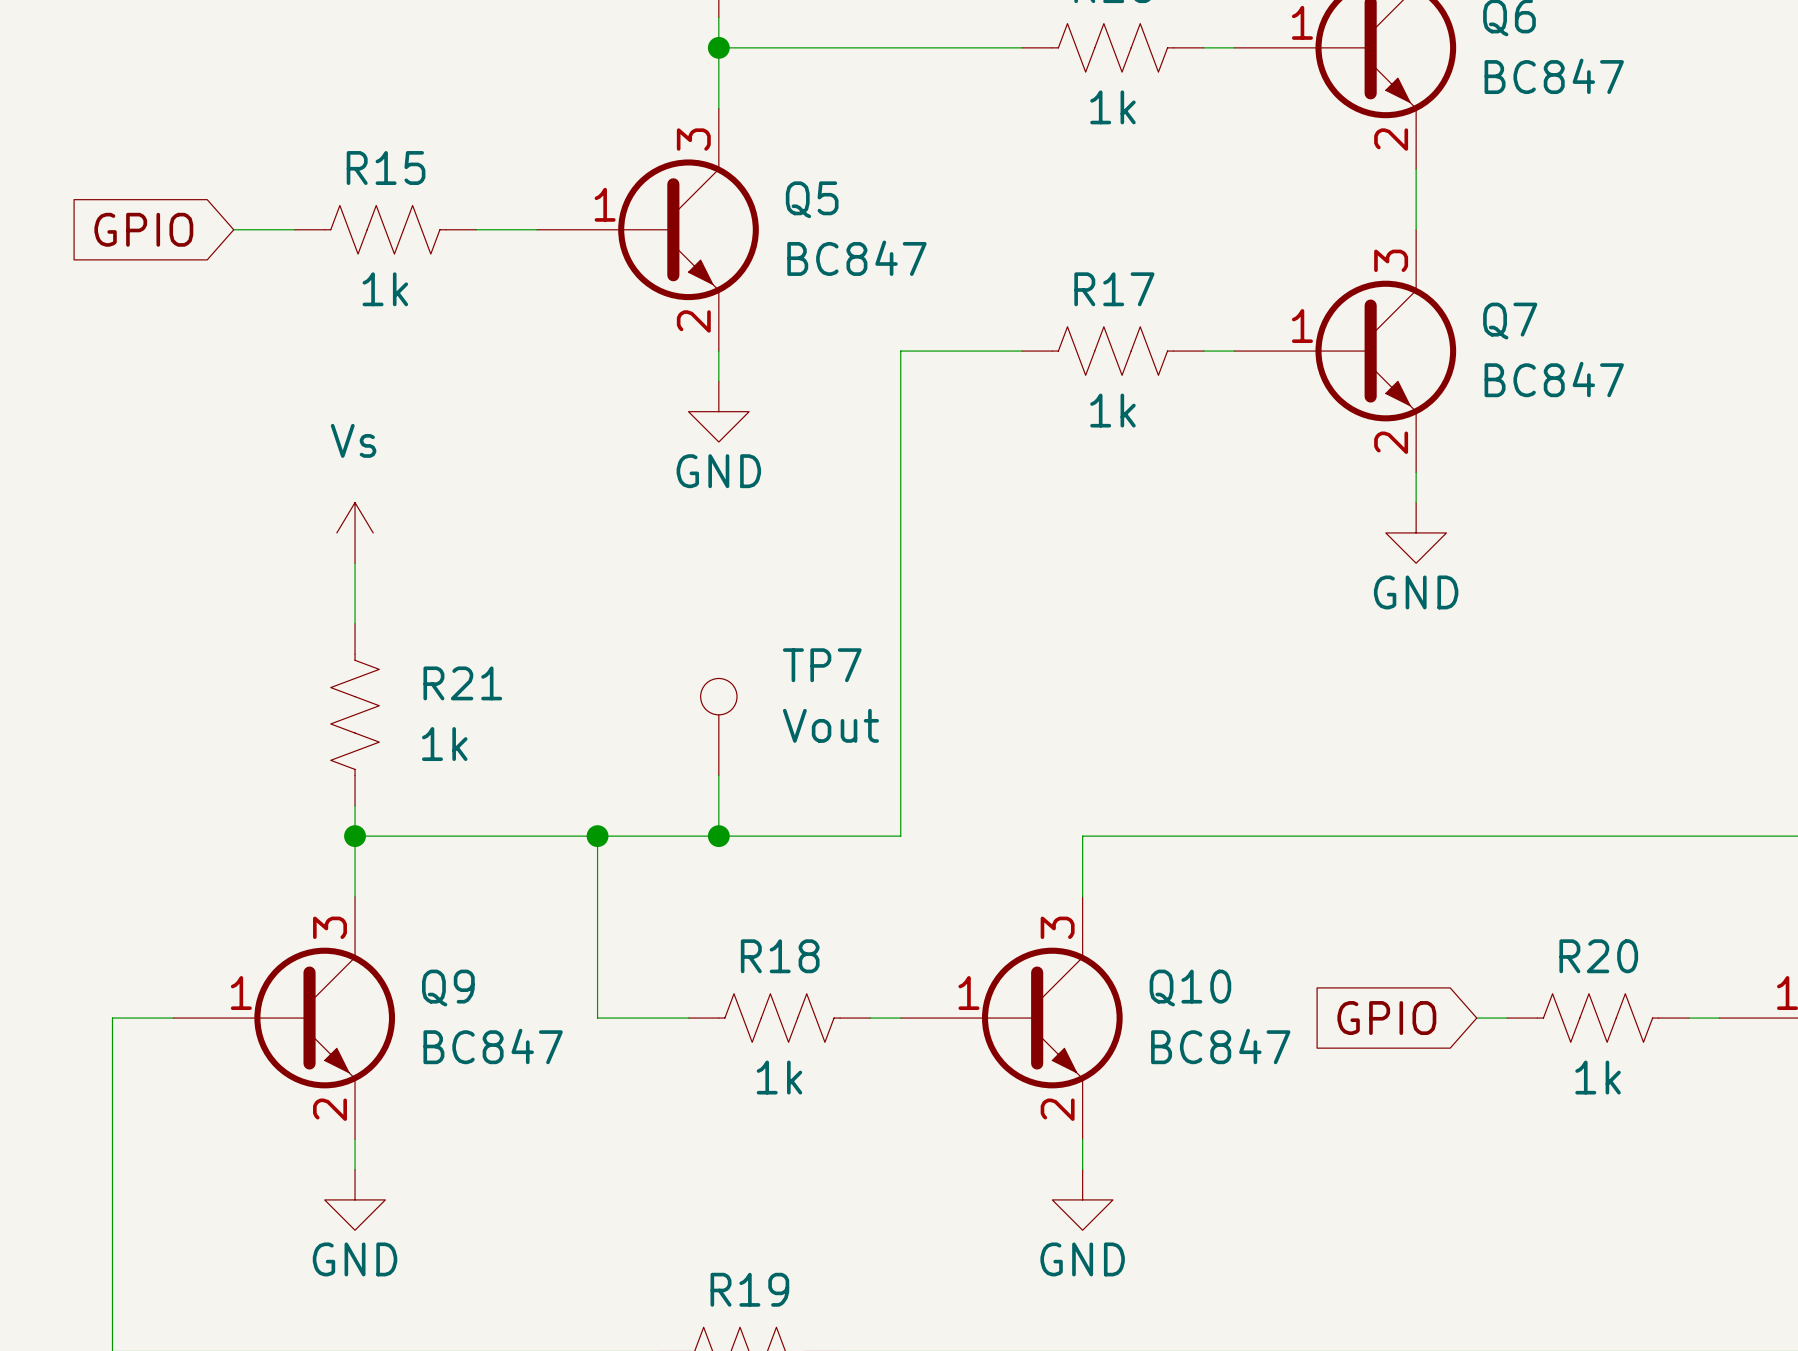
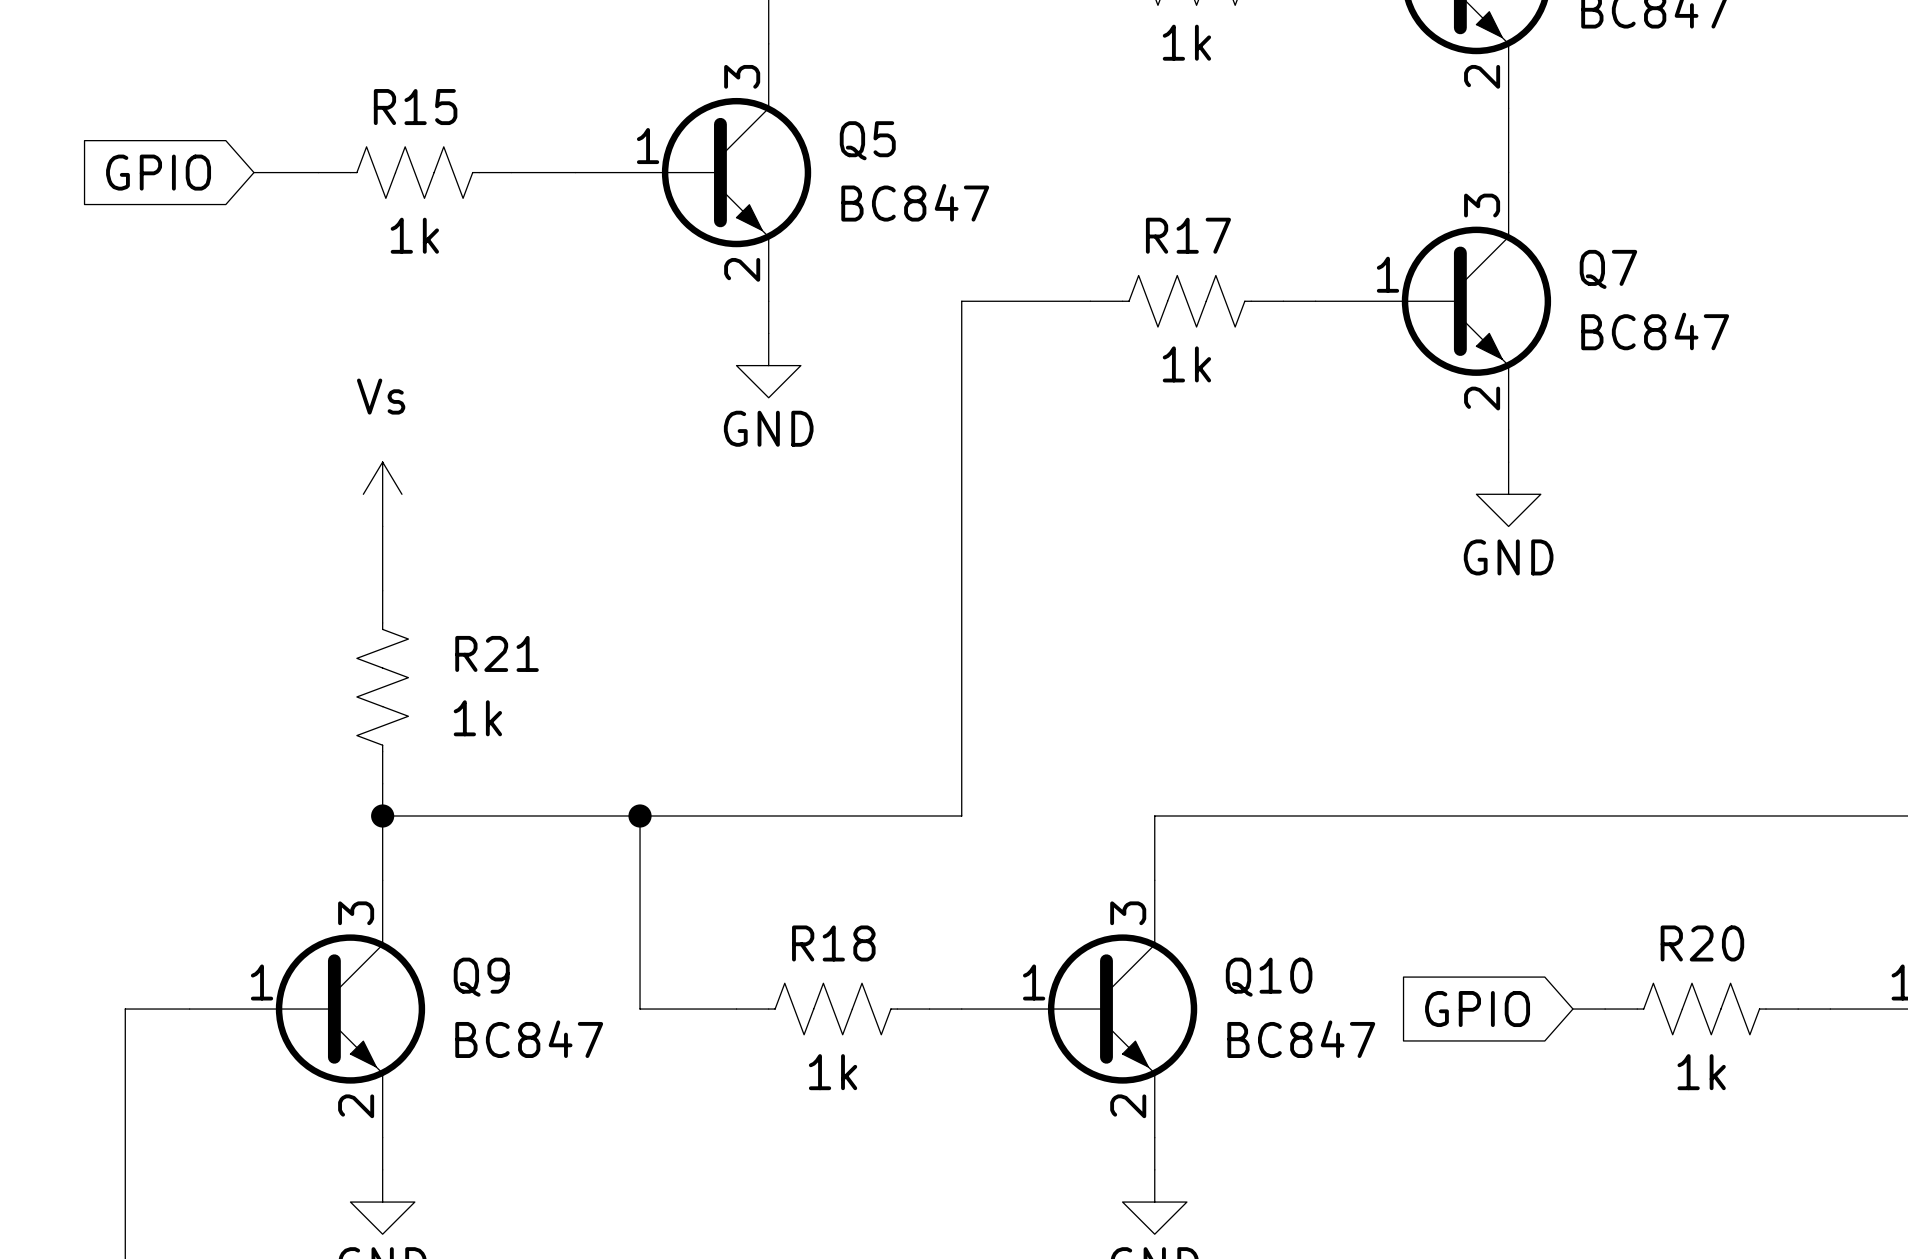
TP7: Vout (718, 726) -> none
wire: (718, 775) (718, 836) -> none
junction: (718, 836) -> none

